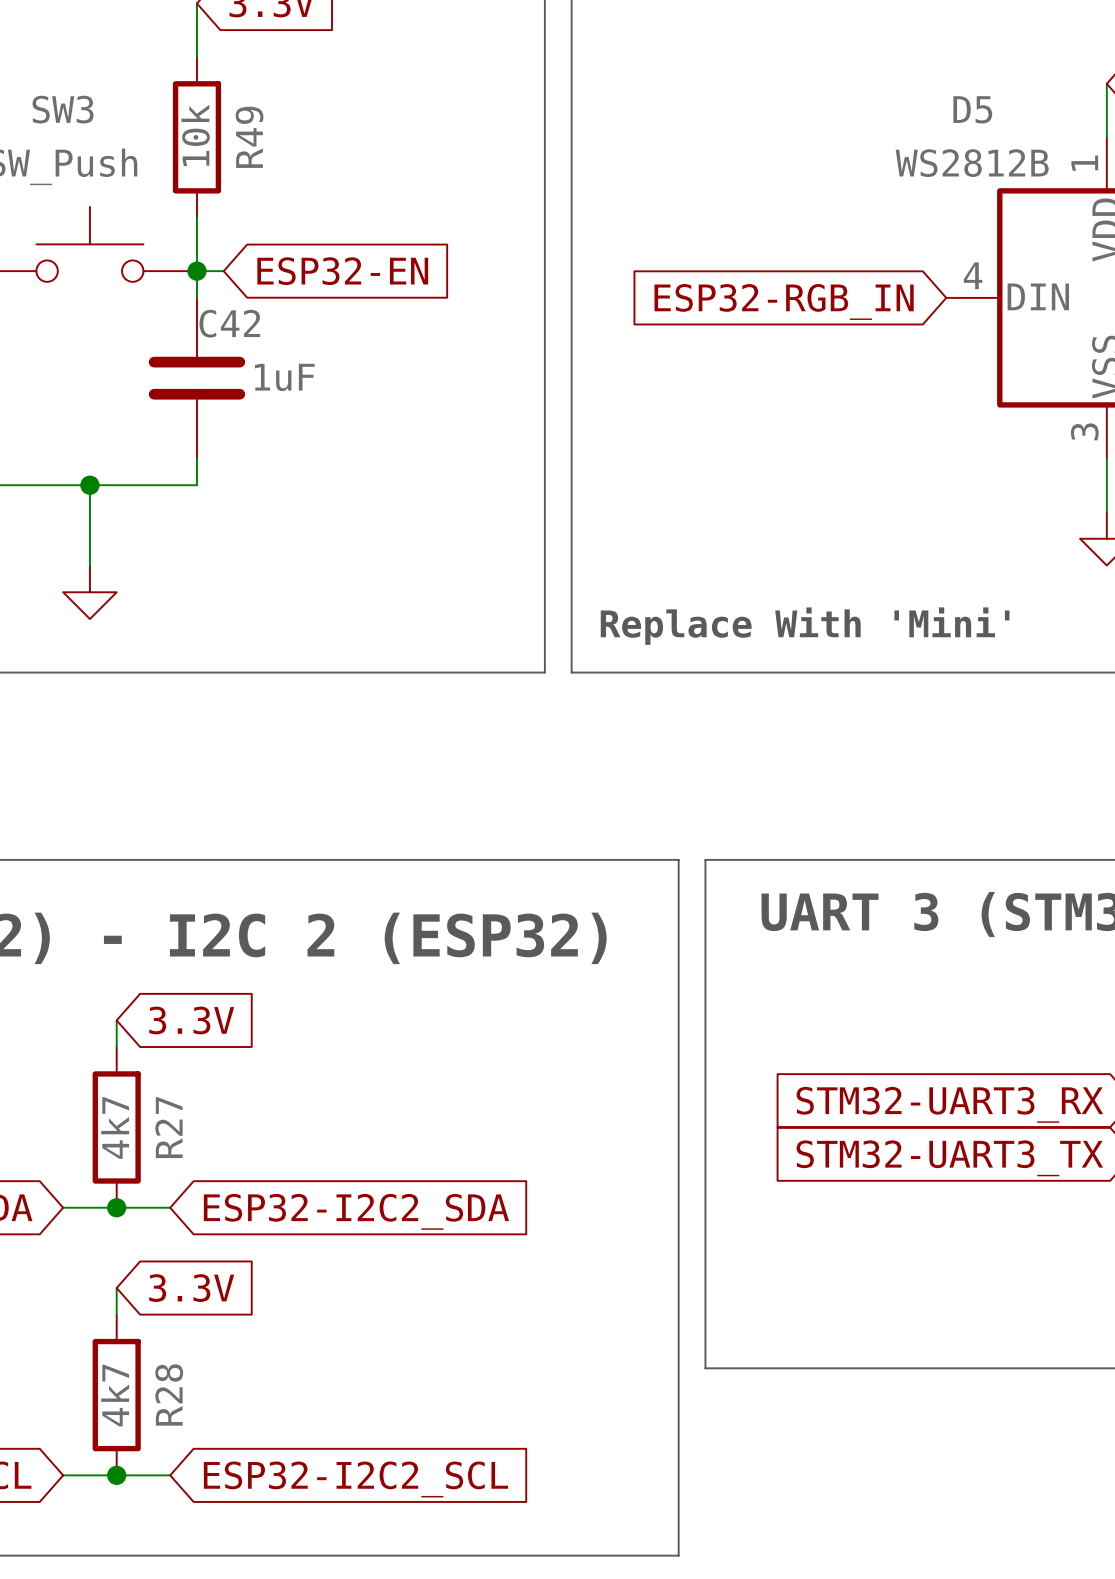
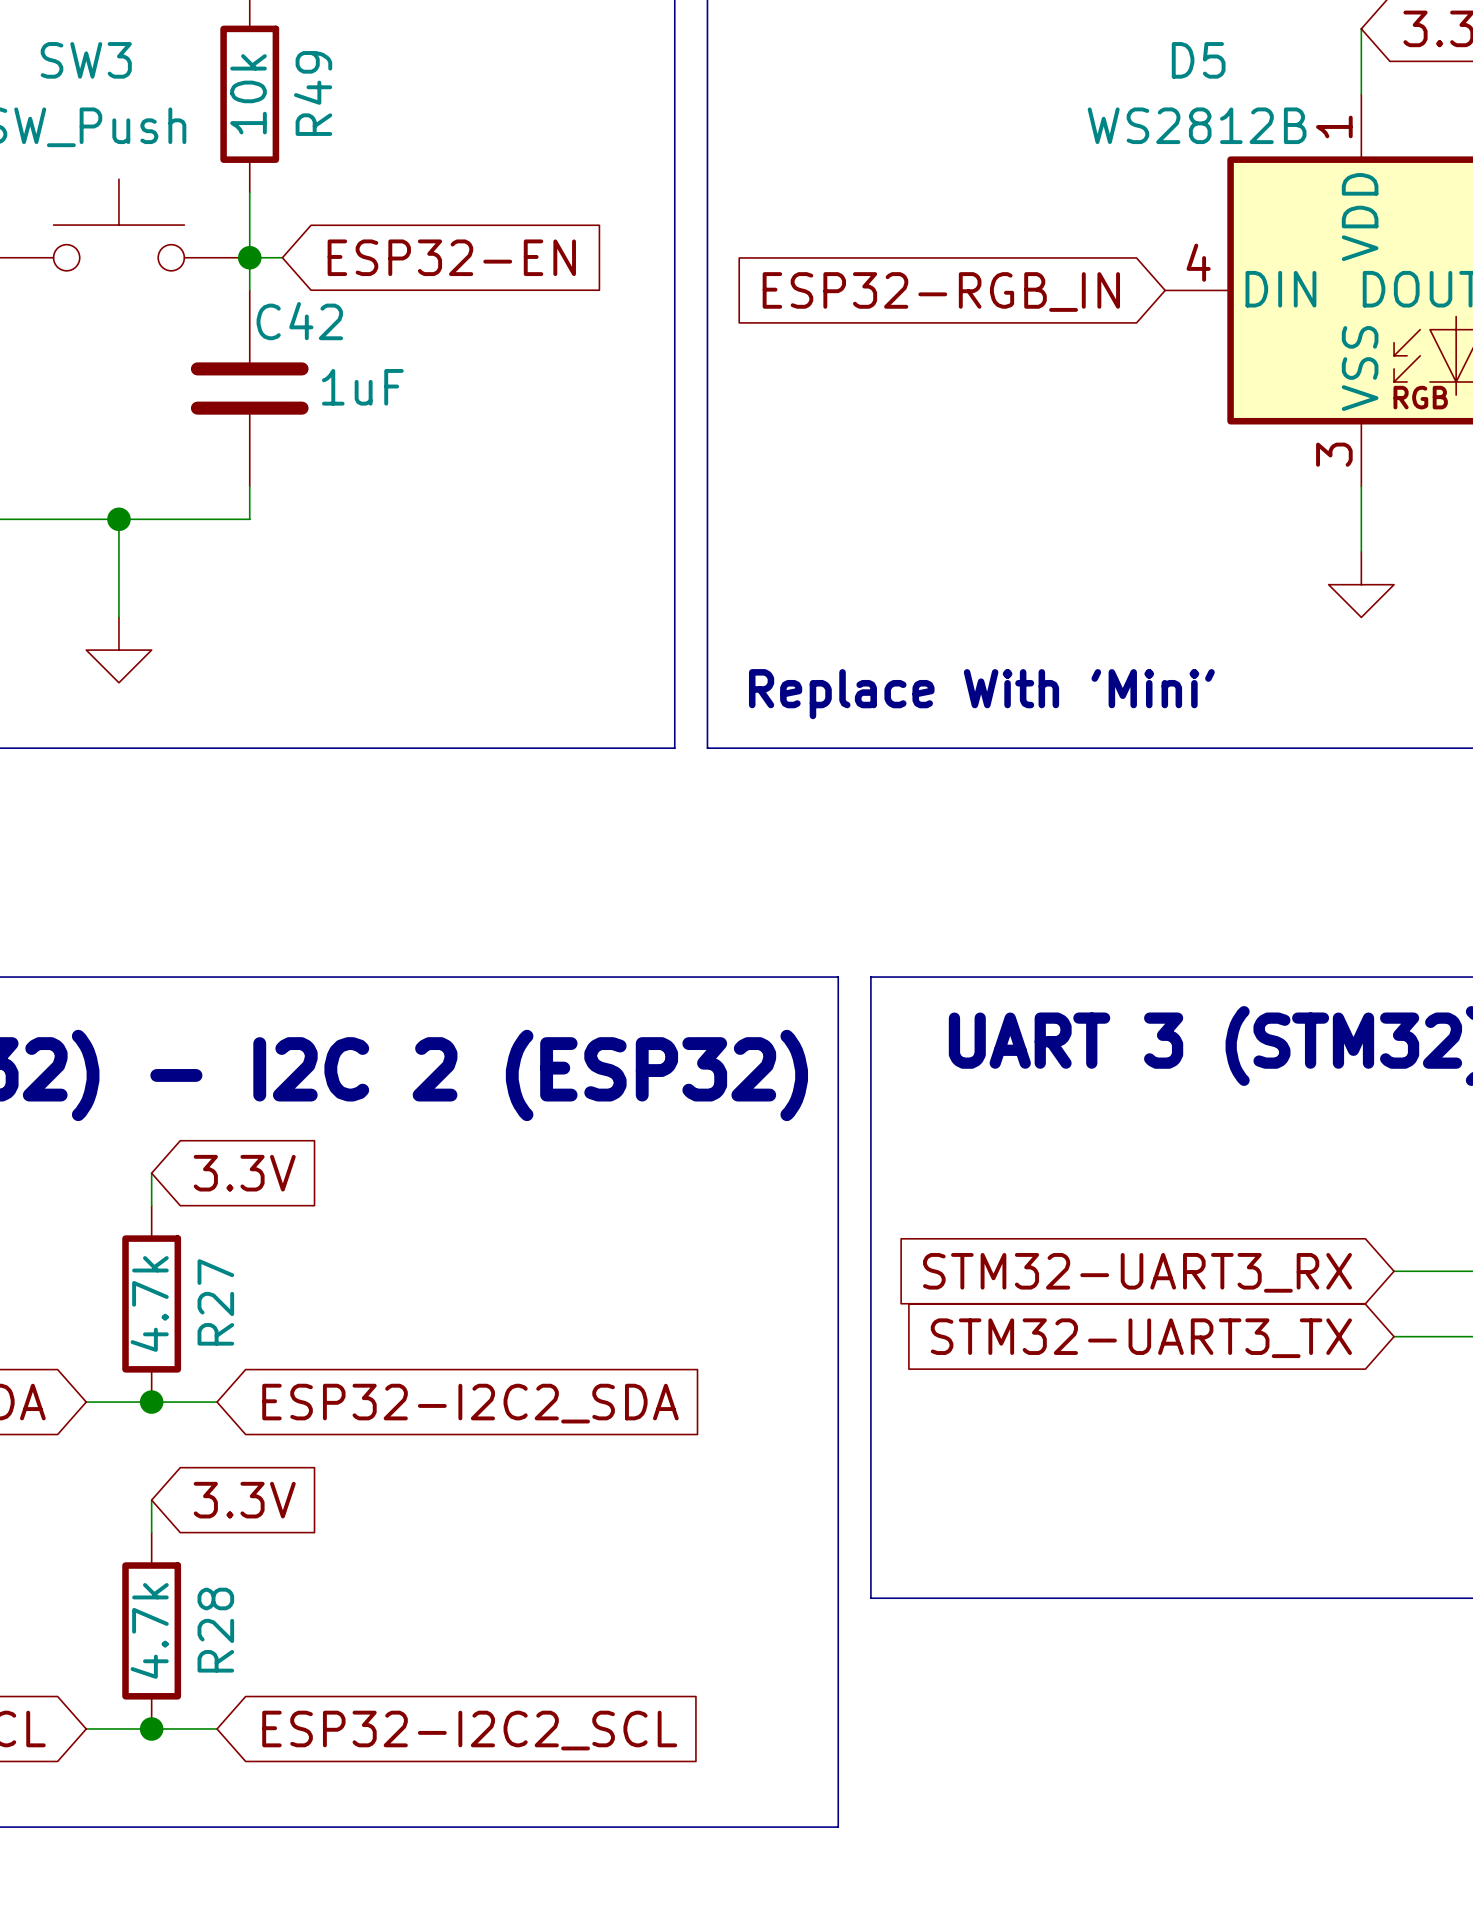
R27 value: 4k7 (115, 1127) -> 4.7k (149, 1303)
R28 value: 4k7 (115, 1395) -> 4.7k (149, 1630)

